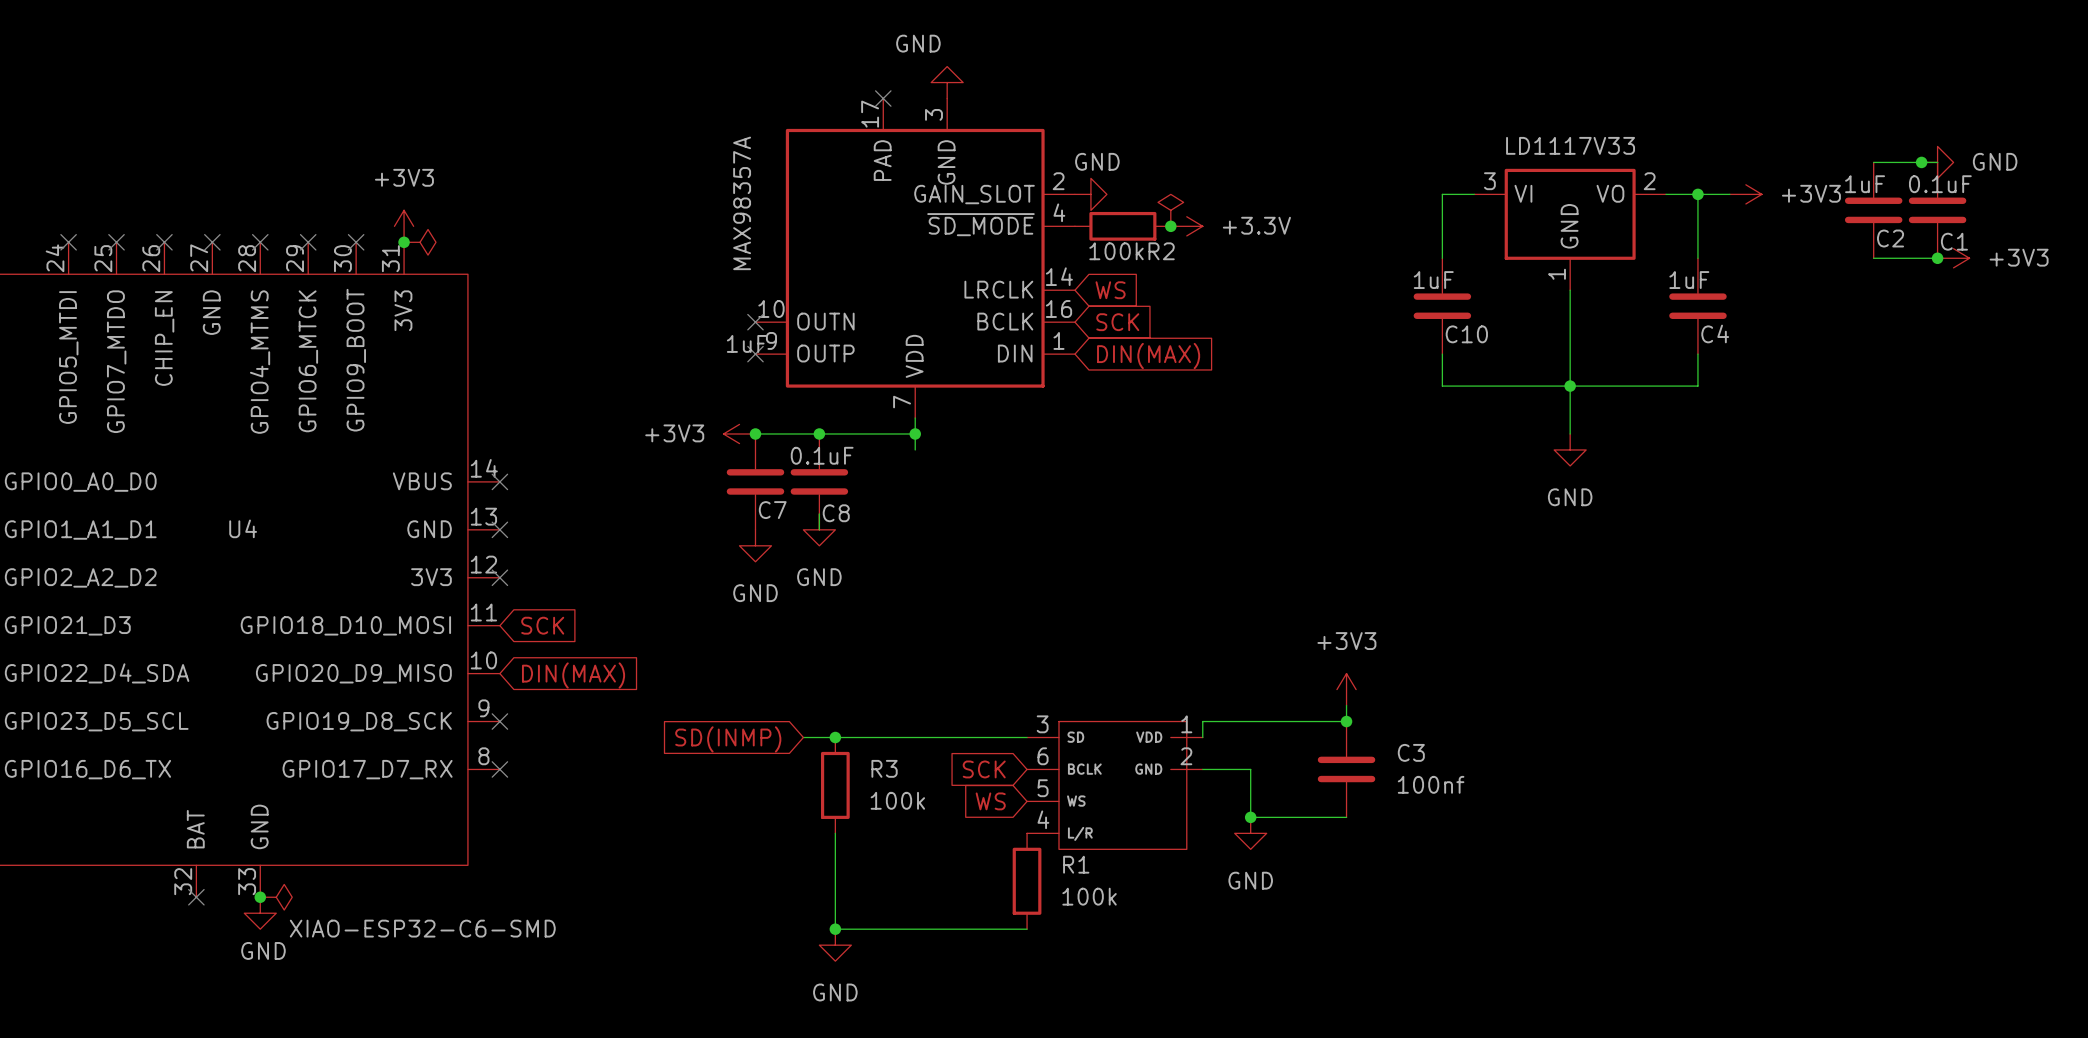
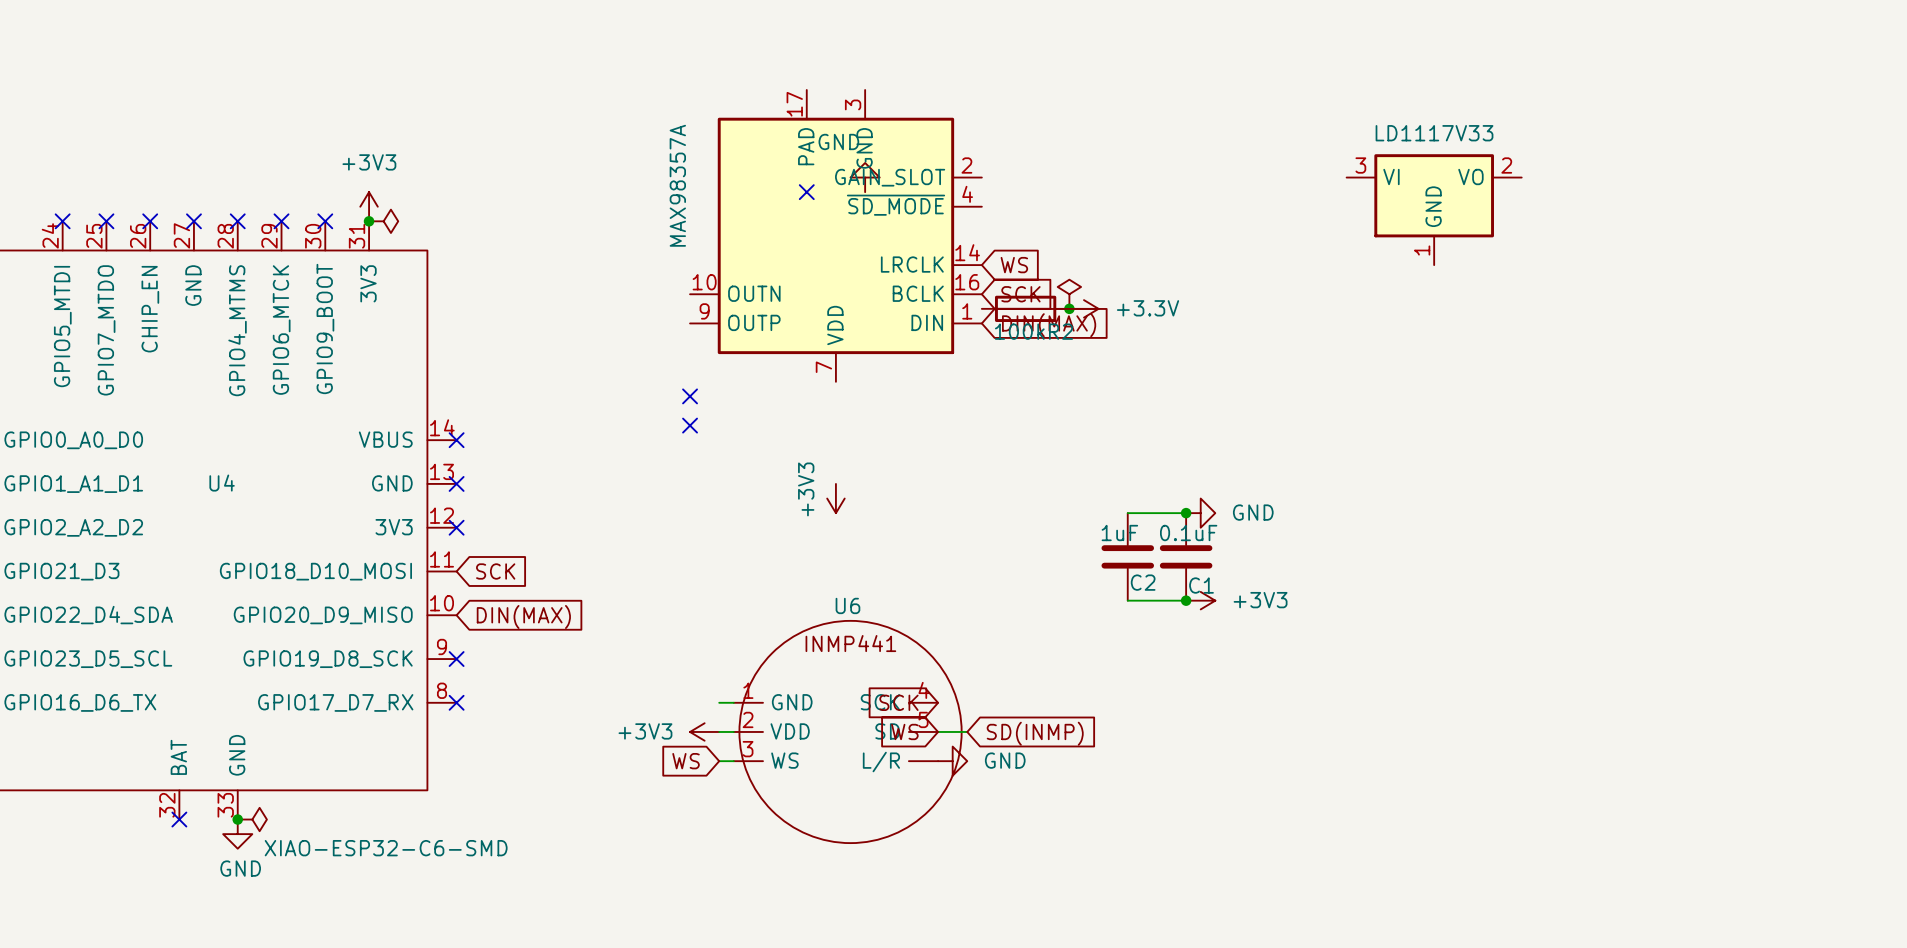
power symbol: GND (947, 82) -> none
no-connect mark: (883, 98) -> none
wire: (1873, 162) (1937, 162) -> none
junction: (1921, 162) -> none
power symbol: GND (1937, 162) -> none
power symbol: none -> GND (865, 177)
power symbol: GND (1090, 194) -> none
wire: (1474, 194) (1442, 194) (1442, 258) -> none
wire: (1666, 194) (1729, 194) -> none
wire: (1697, 194) (1697, 258) -> none
junction: (1697, 194) -> none
power symbol: +3V3 (1745, 194) -> none
no-connect mark: none -> (806, 192)
power symbol position: (1170, 210) -> (1069, 294)
C2 position: (1873, 210) -> (1127, 556)
C1 position: (1937, 210) -> (1186, 556)
R2 position: (1122, 226) -> (1025, 308)
junction: (1170, 226) -> none
power symbol position: +3.3V (1186, 226) -> +3.3V (1083, 308)
wire: (1873, 258) (1937, 258) -> none
junction: (1937, 258) -> none
power symbol: +3V3 (1953, 258) -> none
wire: (1570, 290) (1570, 433) -> none
C10: 1uF (1442, 306) -> none
C4: 1uF (1697, 306) -> none
no-connect mark: (755, 322) -> none
junction: none -> (1069, 308)
no-connect mark: (755, 354) -> none
wire: (1442, 354) (1442, 386) (1697, 386) (1697, 354) -> none
junction: (1570, 386) -> none
wire: (915, 418) (915, 449) -> none
power symbol: +3V3 (739, 433) -> none
wire: (755, 433) (915, 433) -> none
junction: (755, 433) -> none
no-connect mark: none -> (690, 396)
junction: (819, 433) -> none
junction: (915, 433) -> none
power symbol: GND (1570, 449) -> none
no-connect mark: none -> (690, 425)
C7: 1uF (755, 481) -> none
C8: 0.1uF (819, 481) -> none
wire: (819, 513) (819, 529) -> none
power symbol: GND (819, 529) -> none
power symbol: GND (755, 545) -> none
power symbol: none -> +3V3 (835, 498)
wire: none -> (1127, 513) (1186, 513)
junction: none -> (1186, 513)
power symbol: none -> GND (1200, 513)
wire: none -> (1127, 600) (1186, 600)
junction: none -> (1186, 600)
power symbol rotation: 0° (1346, 689) -> 90° clockwise (1200, 600)
power symbol position: +3V3 (1346, 689) -> +3V3 (1200, 600)
wire: (1346, 705) (1346, 721) (1202, 721) (1202, 737) -> none
junction: (1346, 721) -> none
wire: (803, 737) (1027, 737) -> none
junction: (835, 737) -> none
global label rotation: 0° (728, 739) -> 180° (1035, 733)
global label position: SD(INMP) (728, 739) -> SD(INMP) (1035, 733)
wire: none -> (719, 702) (733, 702)
wire: (1202, 769) (1250, 769) (1250, 817) (1346, 817) -> none
C3: 100nf (1346, 769) -> none
R3: 100k (835, 785) -> none
part: (1114, 785) -> none
power symbol: none -> +3V3 (704, 731)
wire: none -> (719, 731) (733, 731)
U6: none -> (847, 731)
junction: (1250, 817) -> none
global label: none -> WS (686, 761)
wire: none -> (719, 761) (733, 761)
wire: (835, 833) (835, 929) (1027, 929) -> none
power symbol: none -> GND (952, 761)
power symbol: GND (1250, 833) -> none
R1: 100k (1027, 881) -> none
junction: (835, 929) -> none
power symbol: GND (835, 945) -> none

